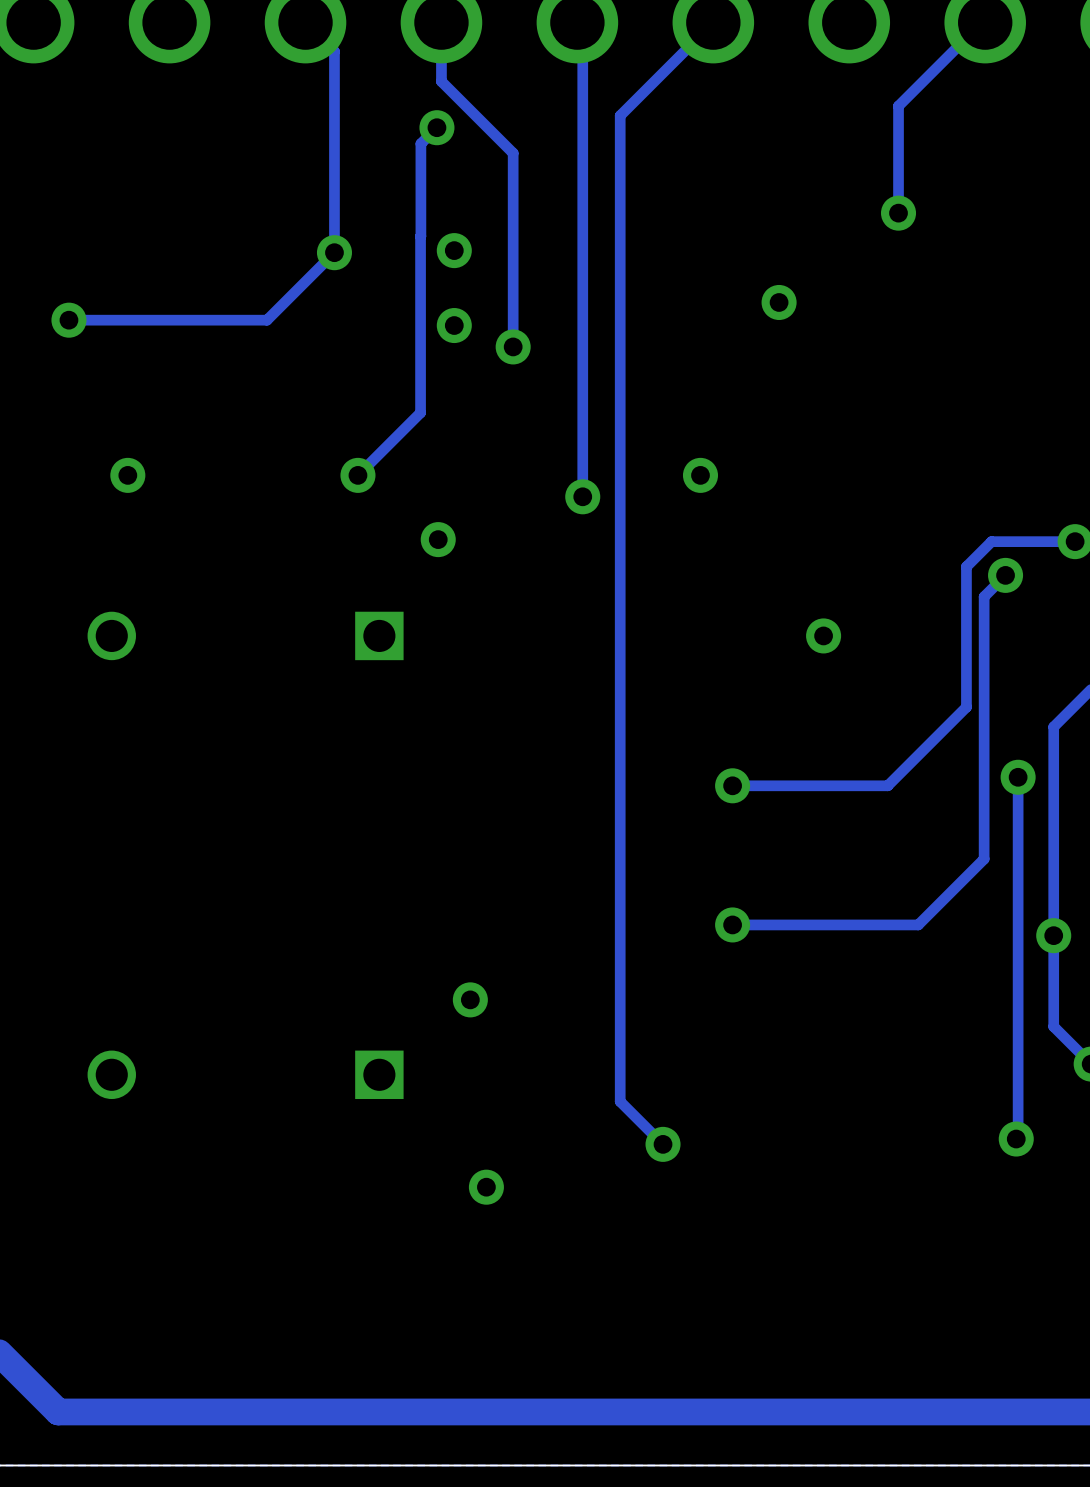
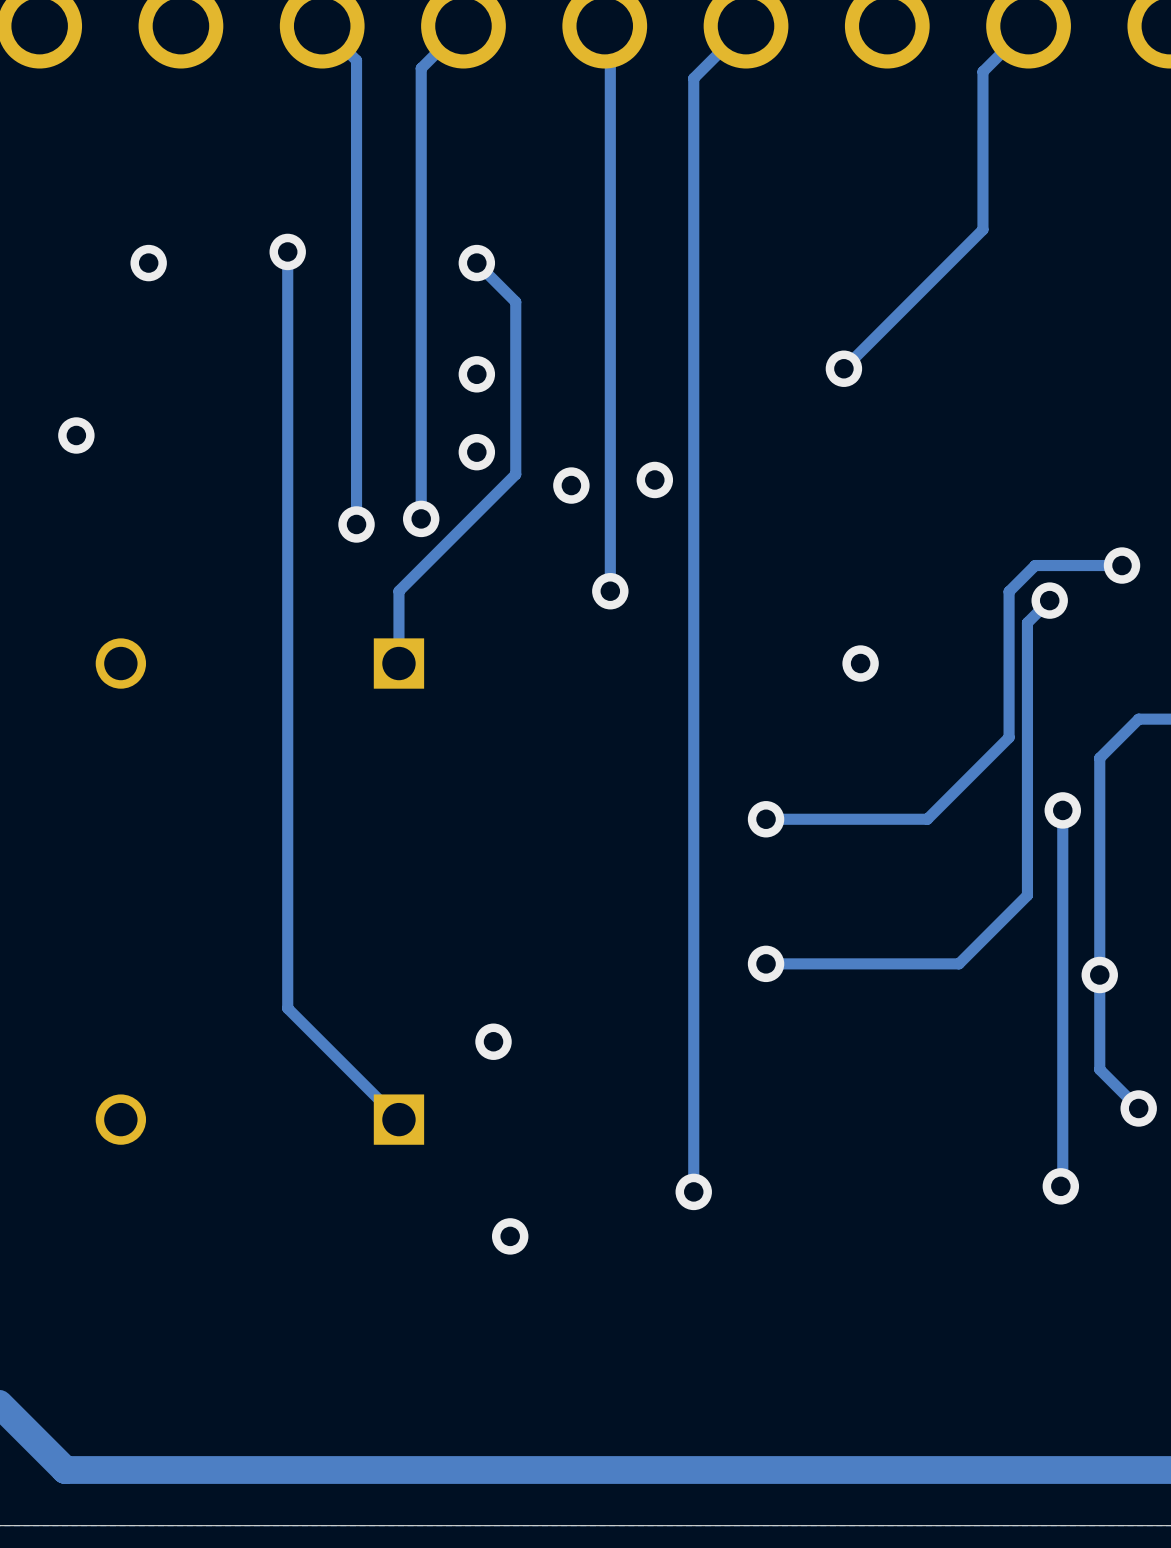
track: (441, 22) (441, 81) (513, 153) (513, 346) -> (463, 26) (421, 68) (421, 518)
track: (985, 22) (982, 22) (898, 106) (898, 213) -> (1028, 26) (982, 71) (982, 229) (843, 368)
track: (334, 51) (334, 252) (266, 320) (68, 320) -> (352, 56) (356, 60) (356, 524)
track: (663, 72) (620, 115) (620, 1101) (663, 1144) -> (693, 78) (693, 1191)
track: (436, 127) (420, 143) (420, 236) -> none
via: (436, 127) -> none
via: (898, 213) -> none
track: (420, 236) (420, 412) (357, 475) -> none
track: none -> (287, 251) (287, 1008) (398, 1119)
via: none -> (148, 263)
track: none -> (476, 263) (515, 302) (515, 474) (398, 591) (398, 663)
via position: (334, 252) -> (287, 251)
via position: (779, 302) -> (843, 368)
via: (68, 320) -> none
via position: (454, 325) -> (476, 374)
via: (513, 346) -> none
via: none -> (76, 435)
via: none -> (476, 452)
via: none -> (654, 479)
via: none -> (571, 485)
via: (127, 475) -> none
via position: (357, 475) -> (356, 524)
via: (700, 475) -> none
via: none -> (421, 518)
track: none -> (610, 518) (610, 591)
via: (582, 496) -> none
via: (438, 539) -> none
via: none -> (610, 591)

